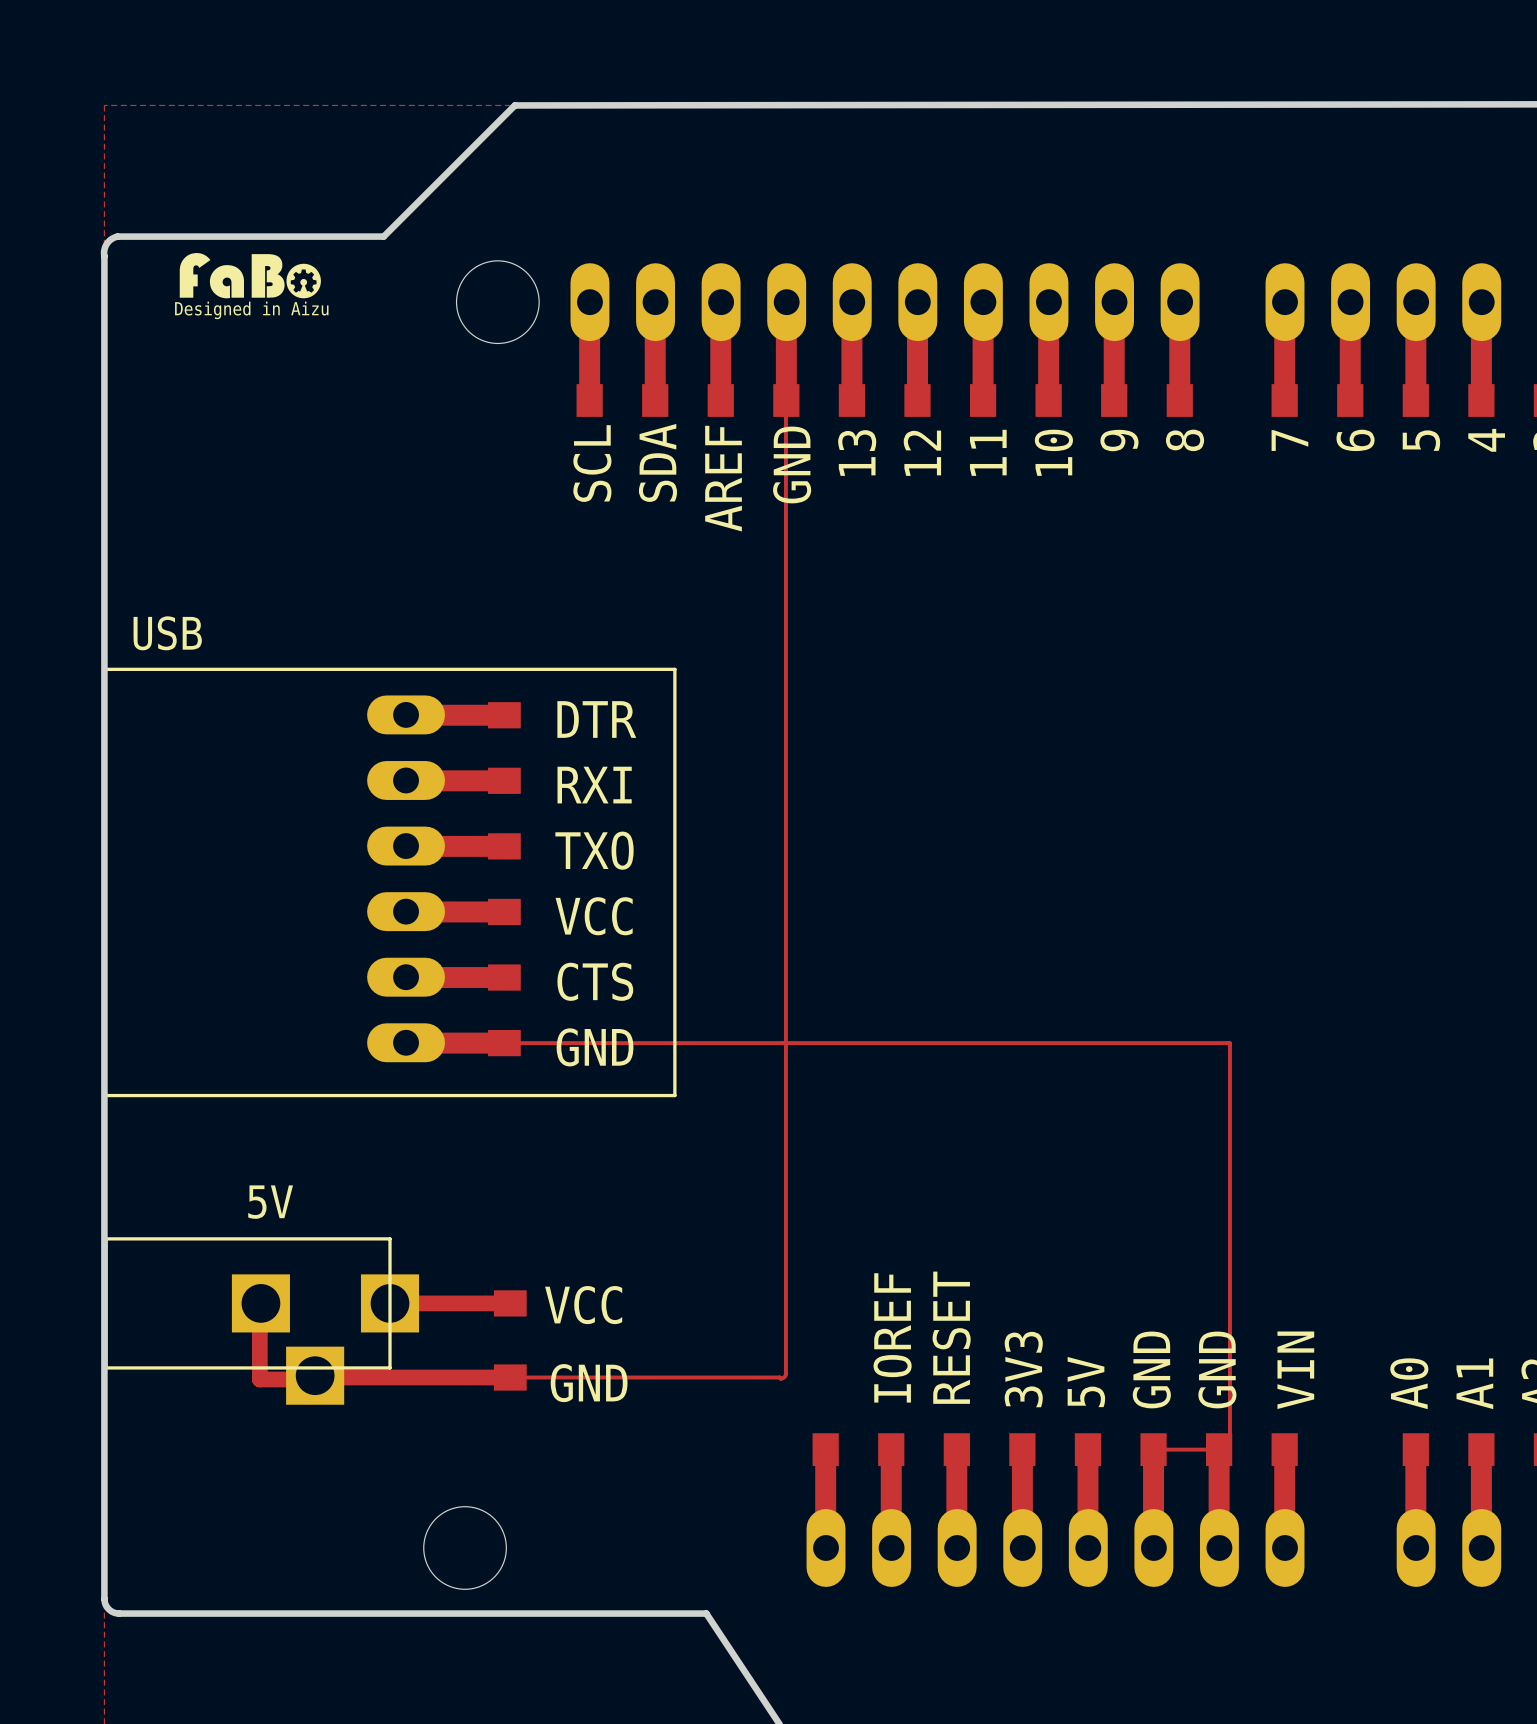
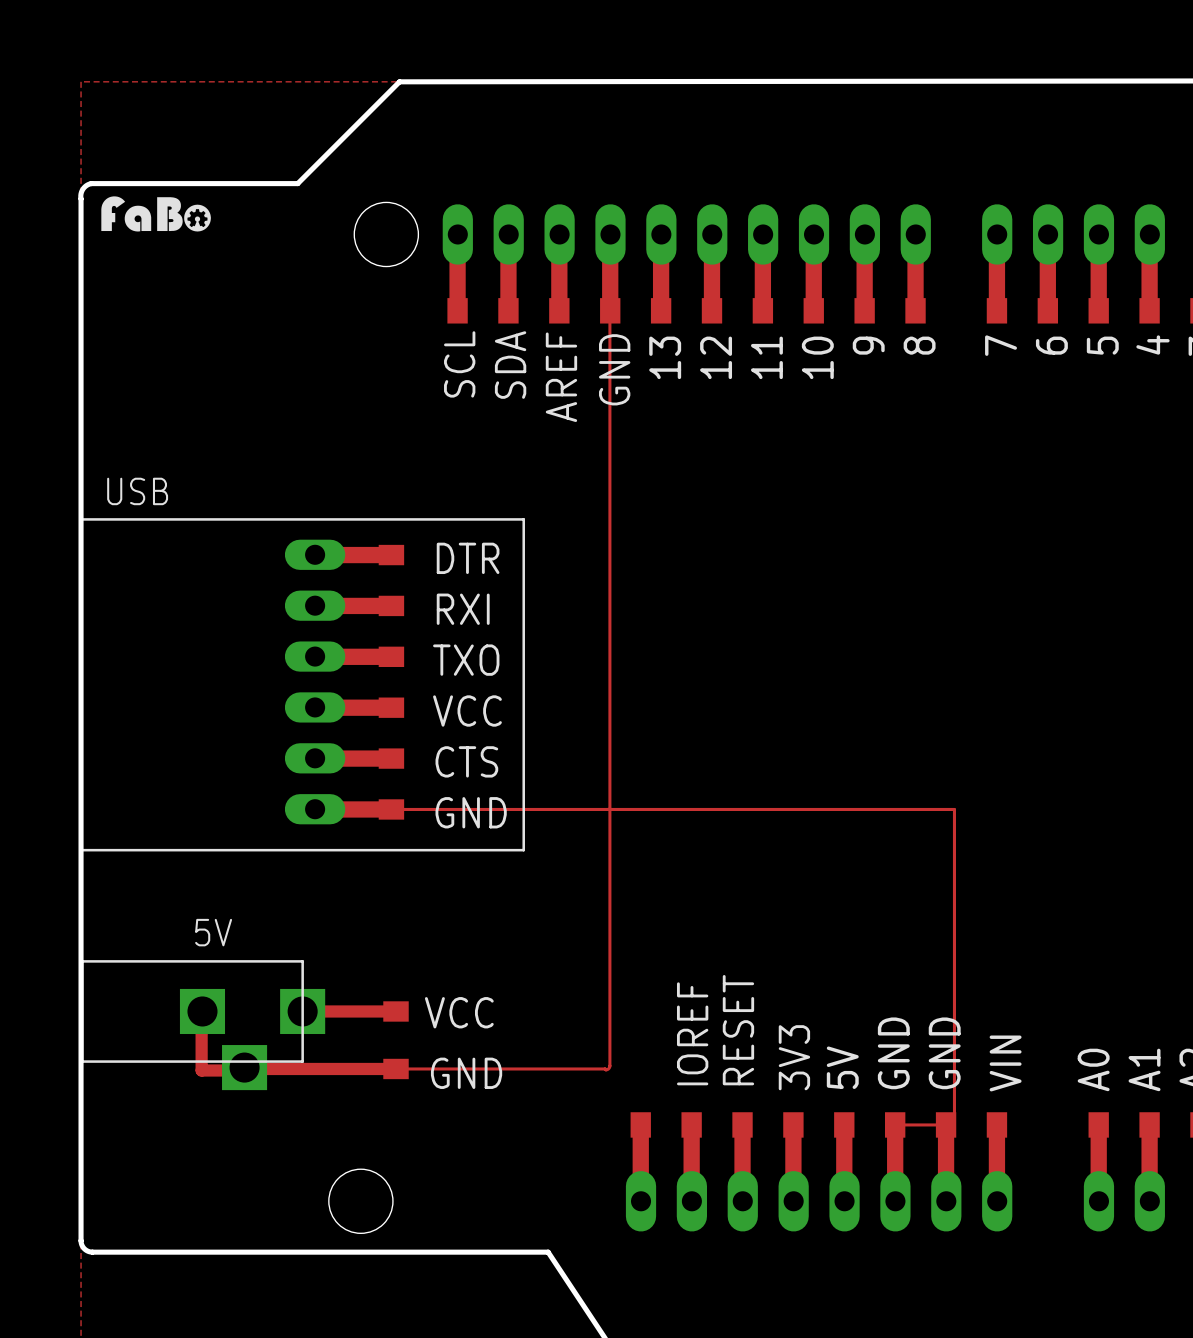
drawing position: (250, 275) -> (156, 213)
text: Designed in Aizu (251, 310) -> none

